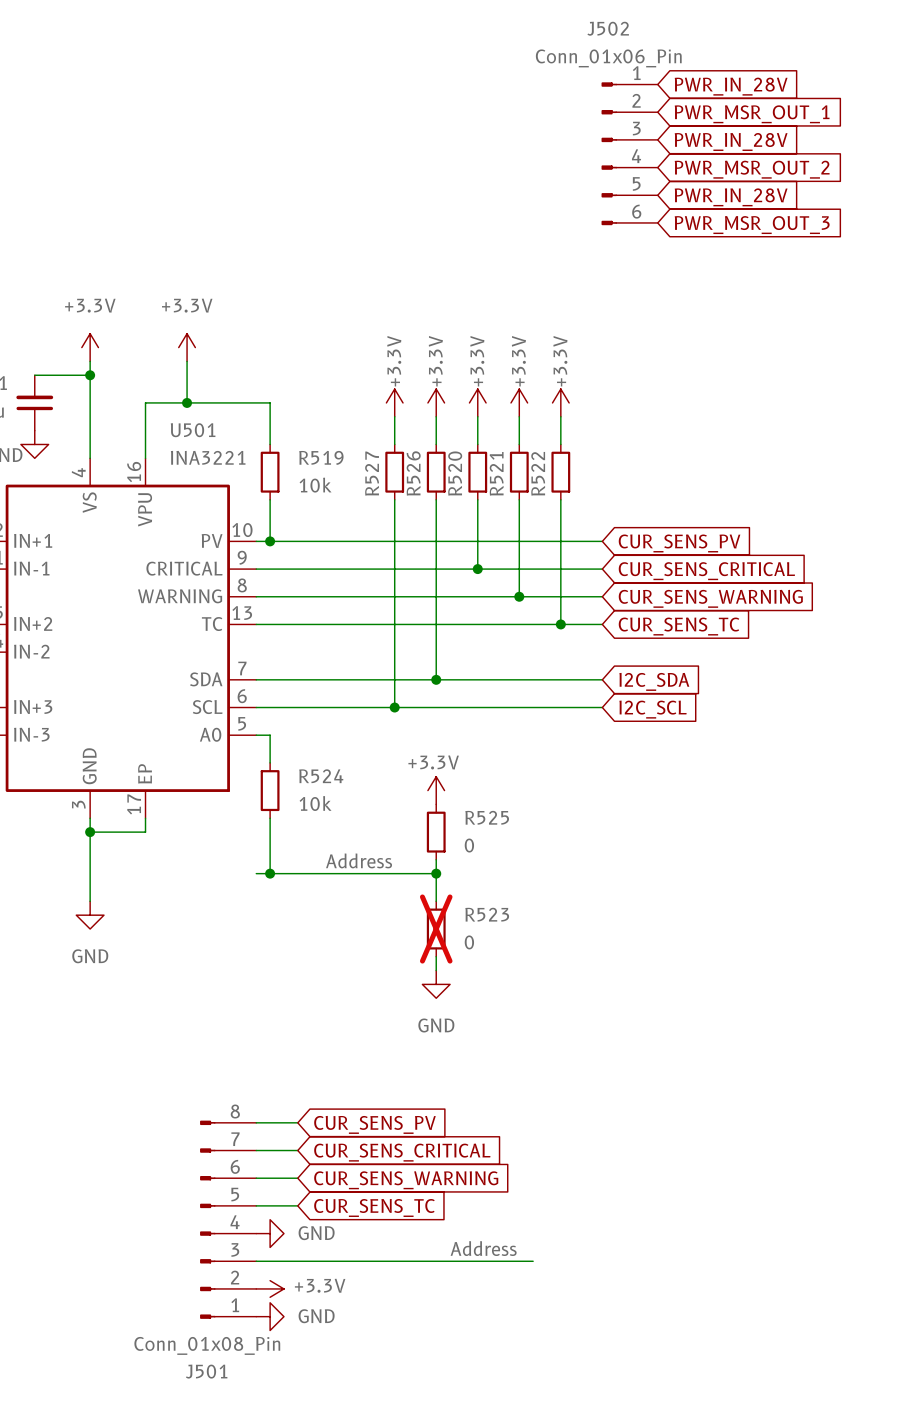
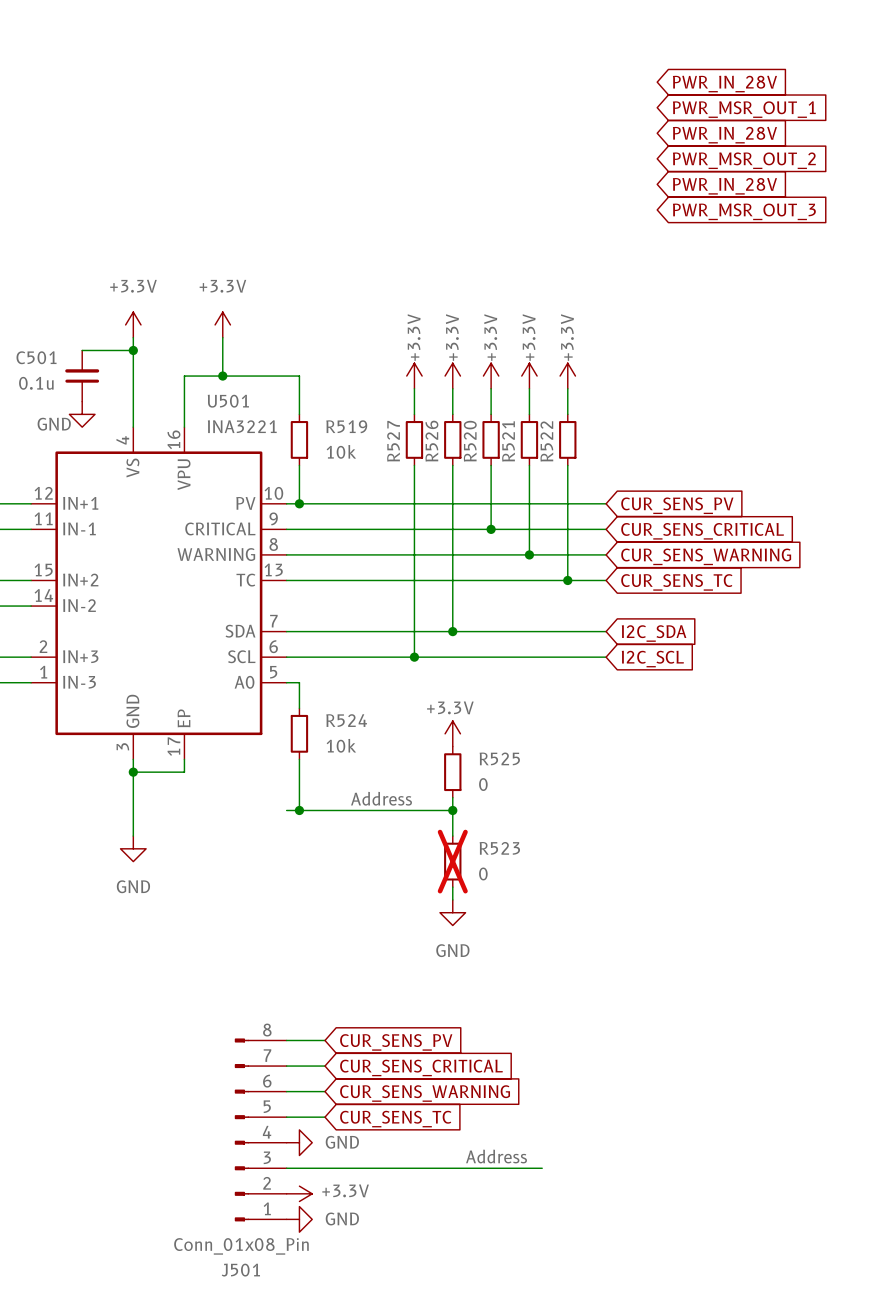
J502: Conn_01x06_Pin (629, 153) -> none

